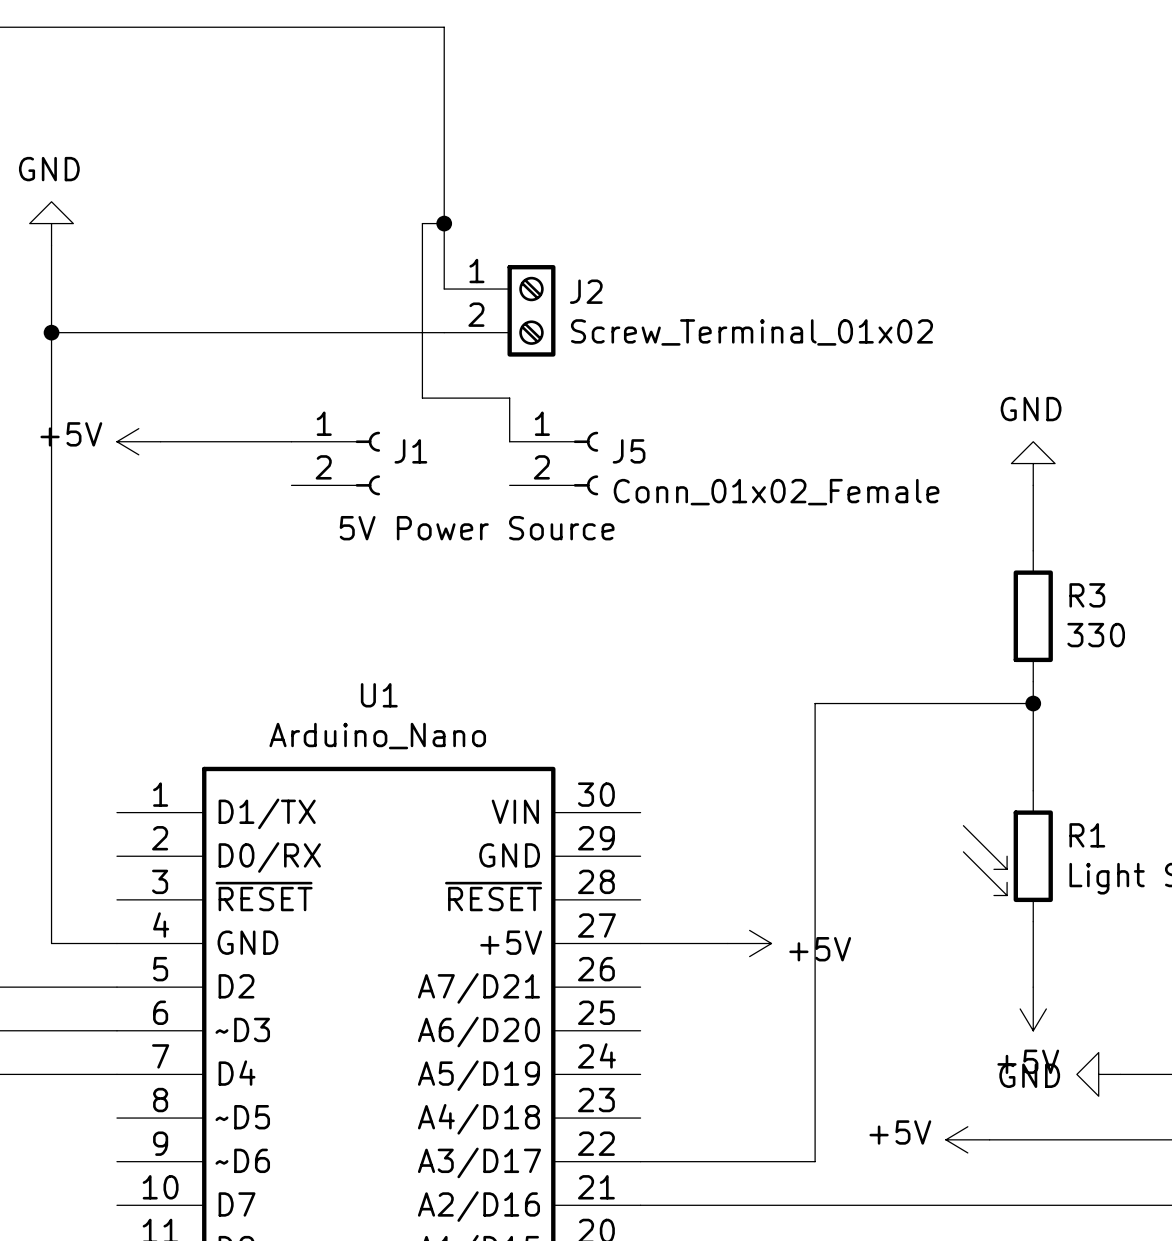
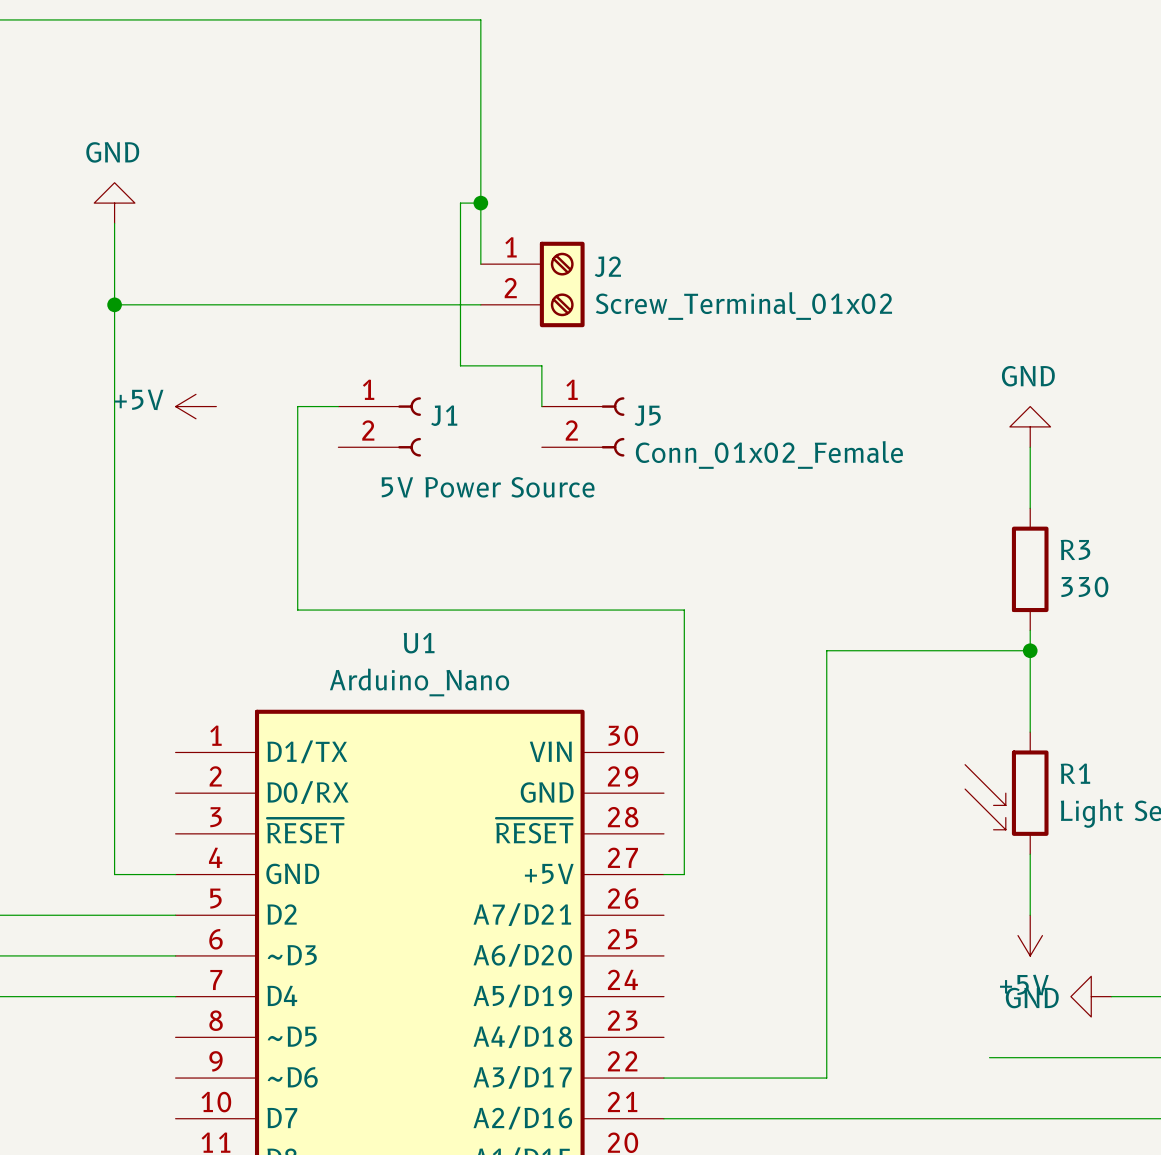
wire: (160, 441) (247, 441) -> none
wire: (662, 943) (727, 943) -> (684, 874) (684, 610) (297, 610) (297, 406)
power symbol: +5V (749, 943) -> none
power symbol: +5V (967, 1139) -> none

